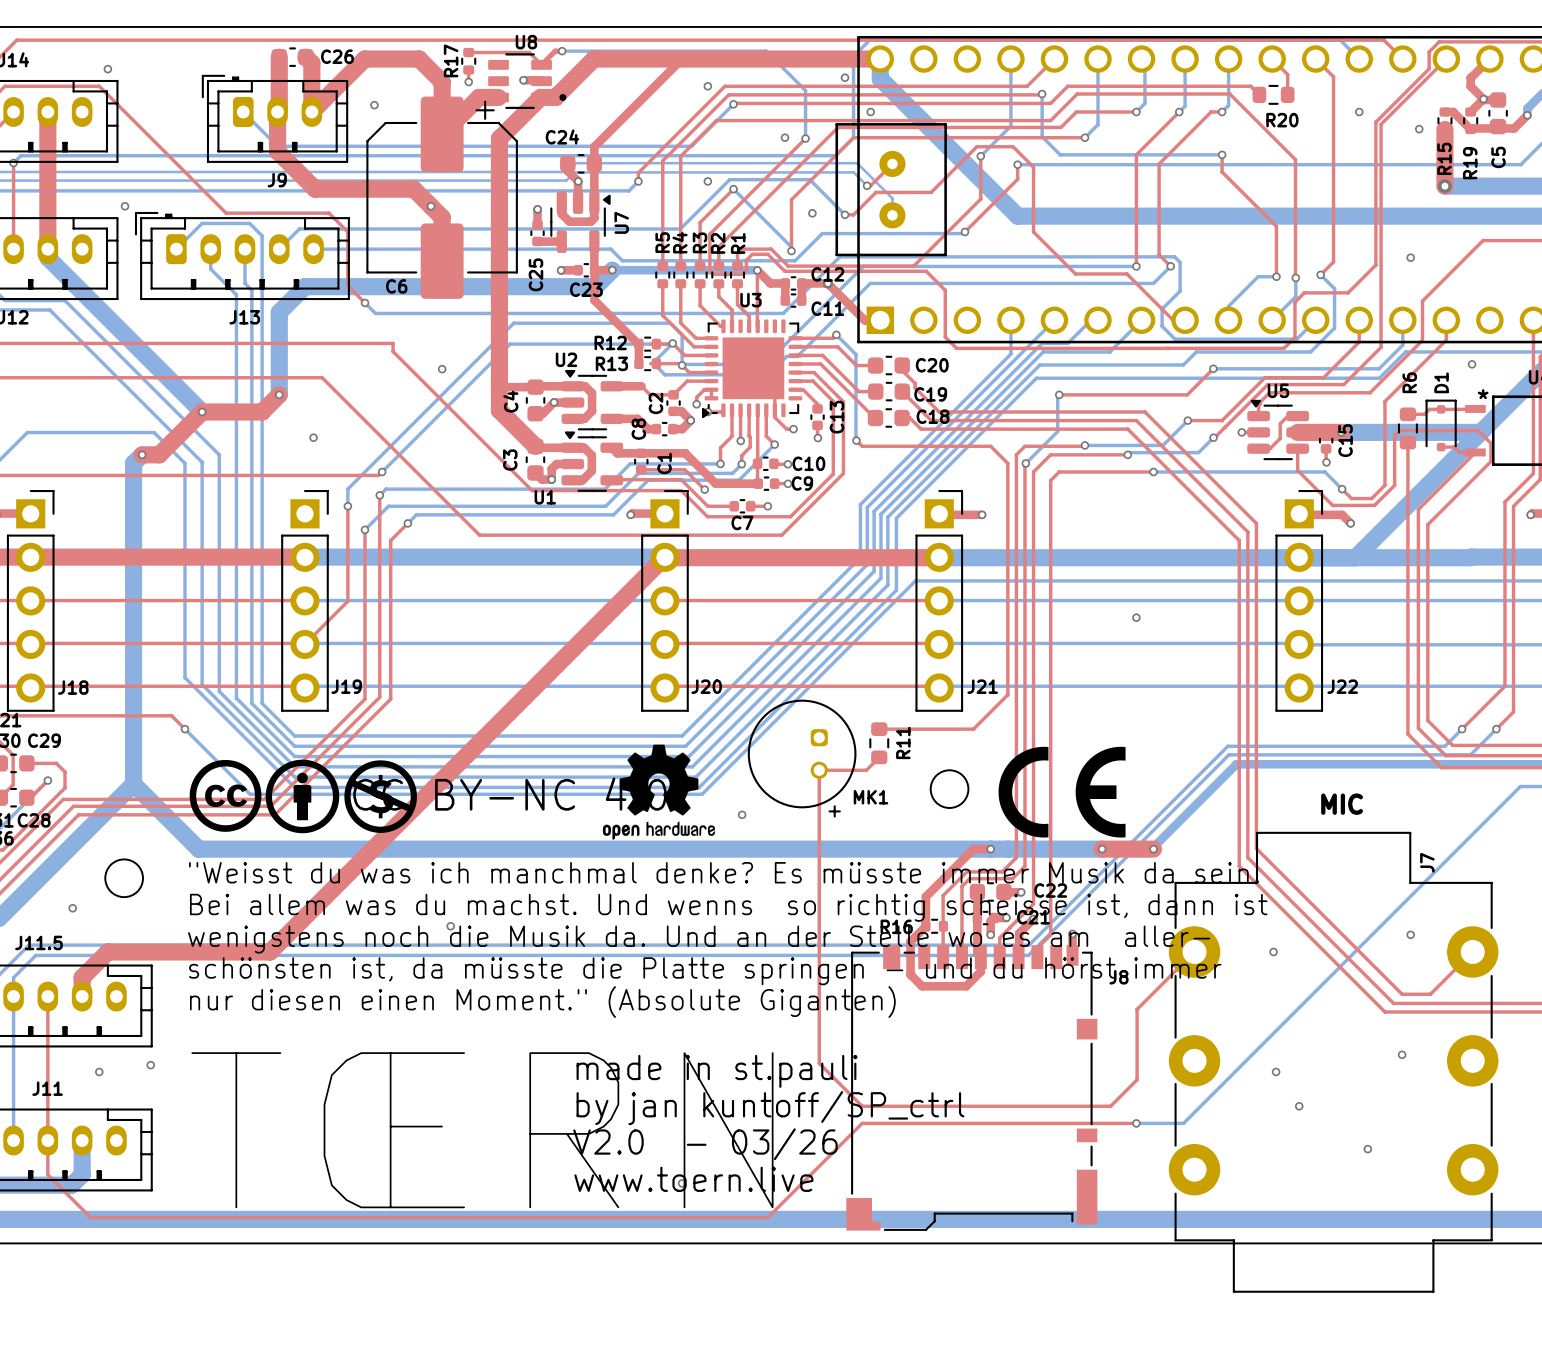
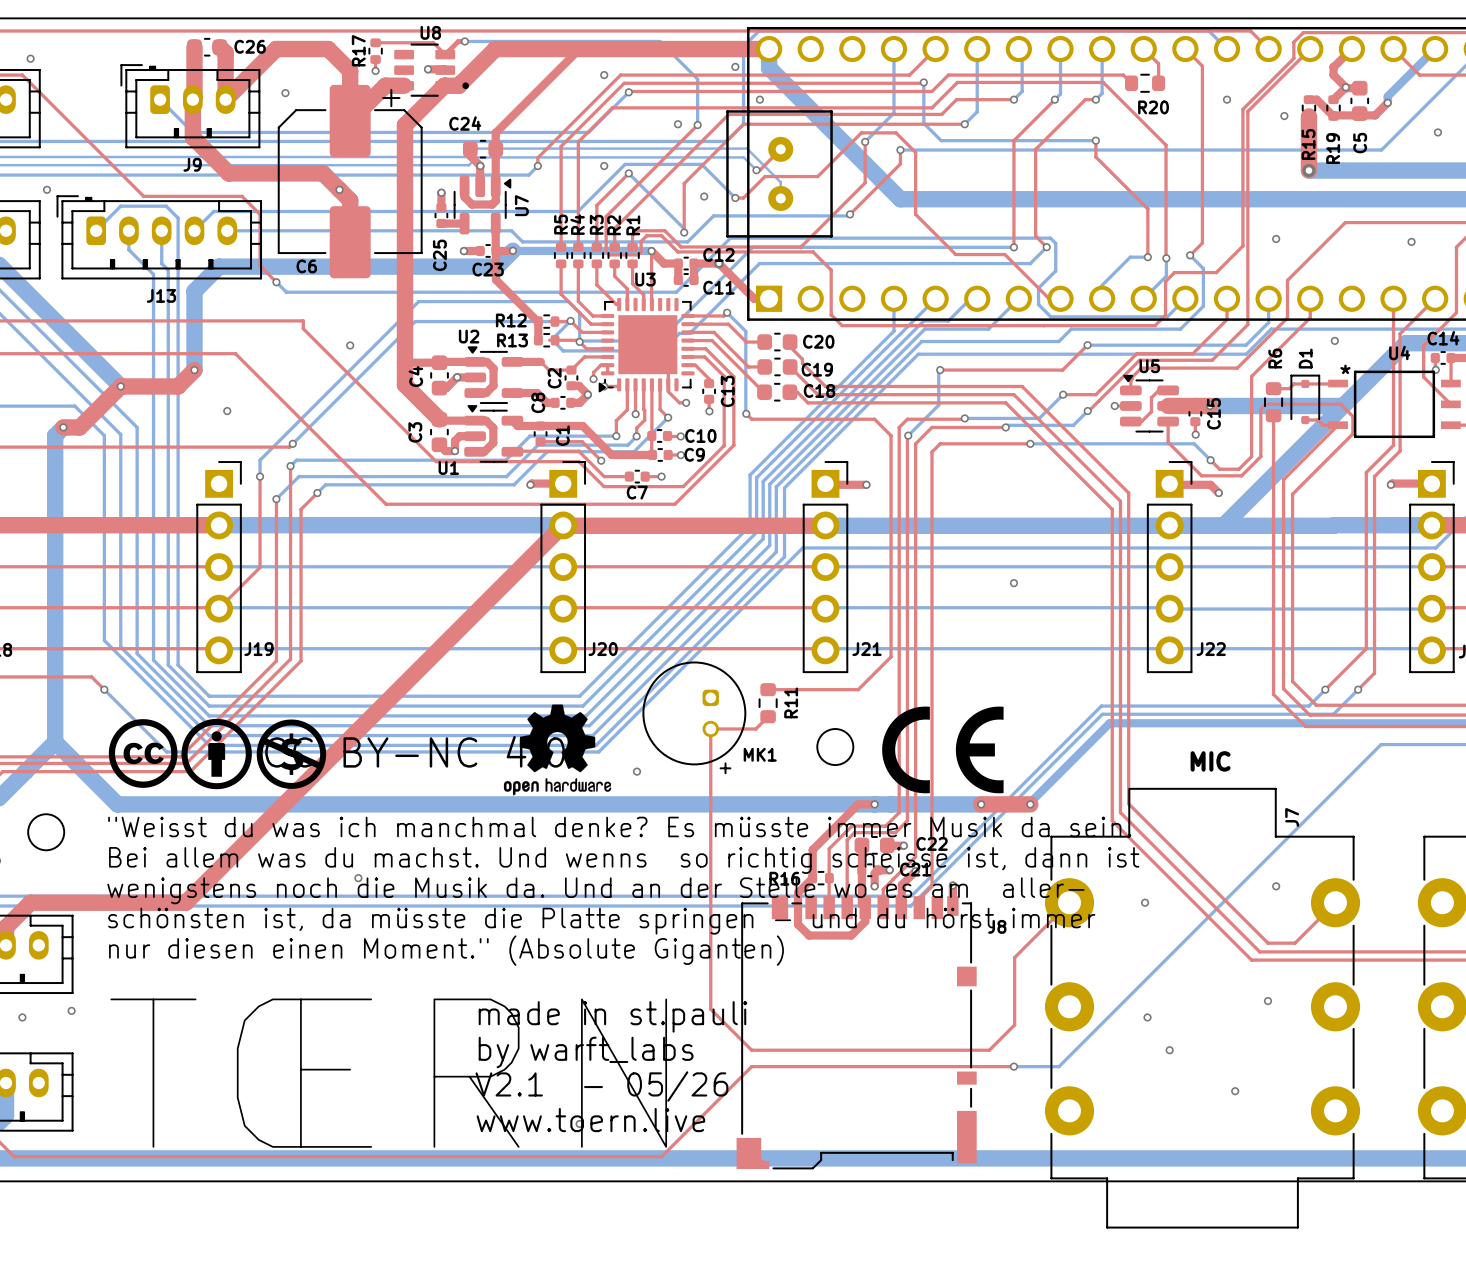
text: by jan kuntoff/SP_ctrl (770, 1108) -> by warft_labs (586, 1052)
text: V2.0 - 03/26 (705, 1144) -> V2.1 - 05/26 (601, 1086)

